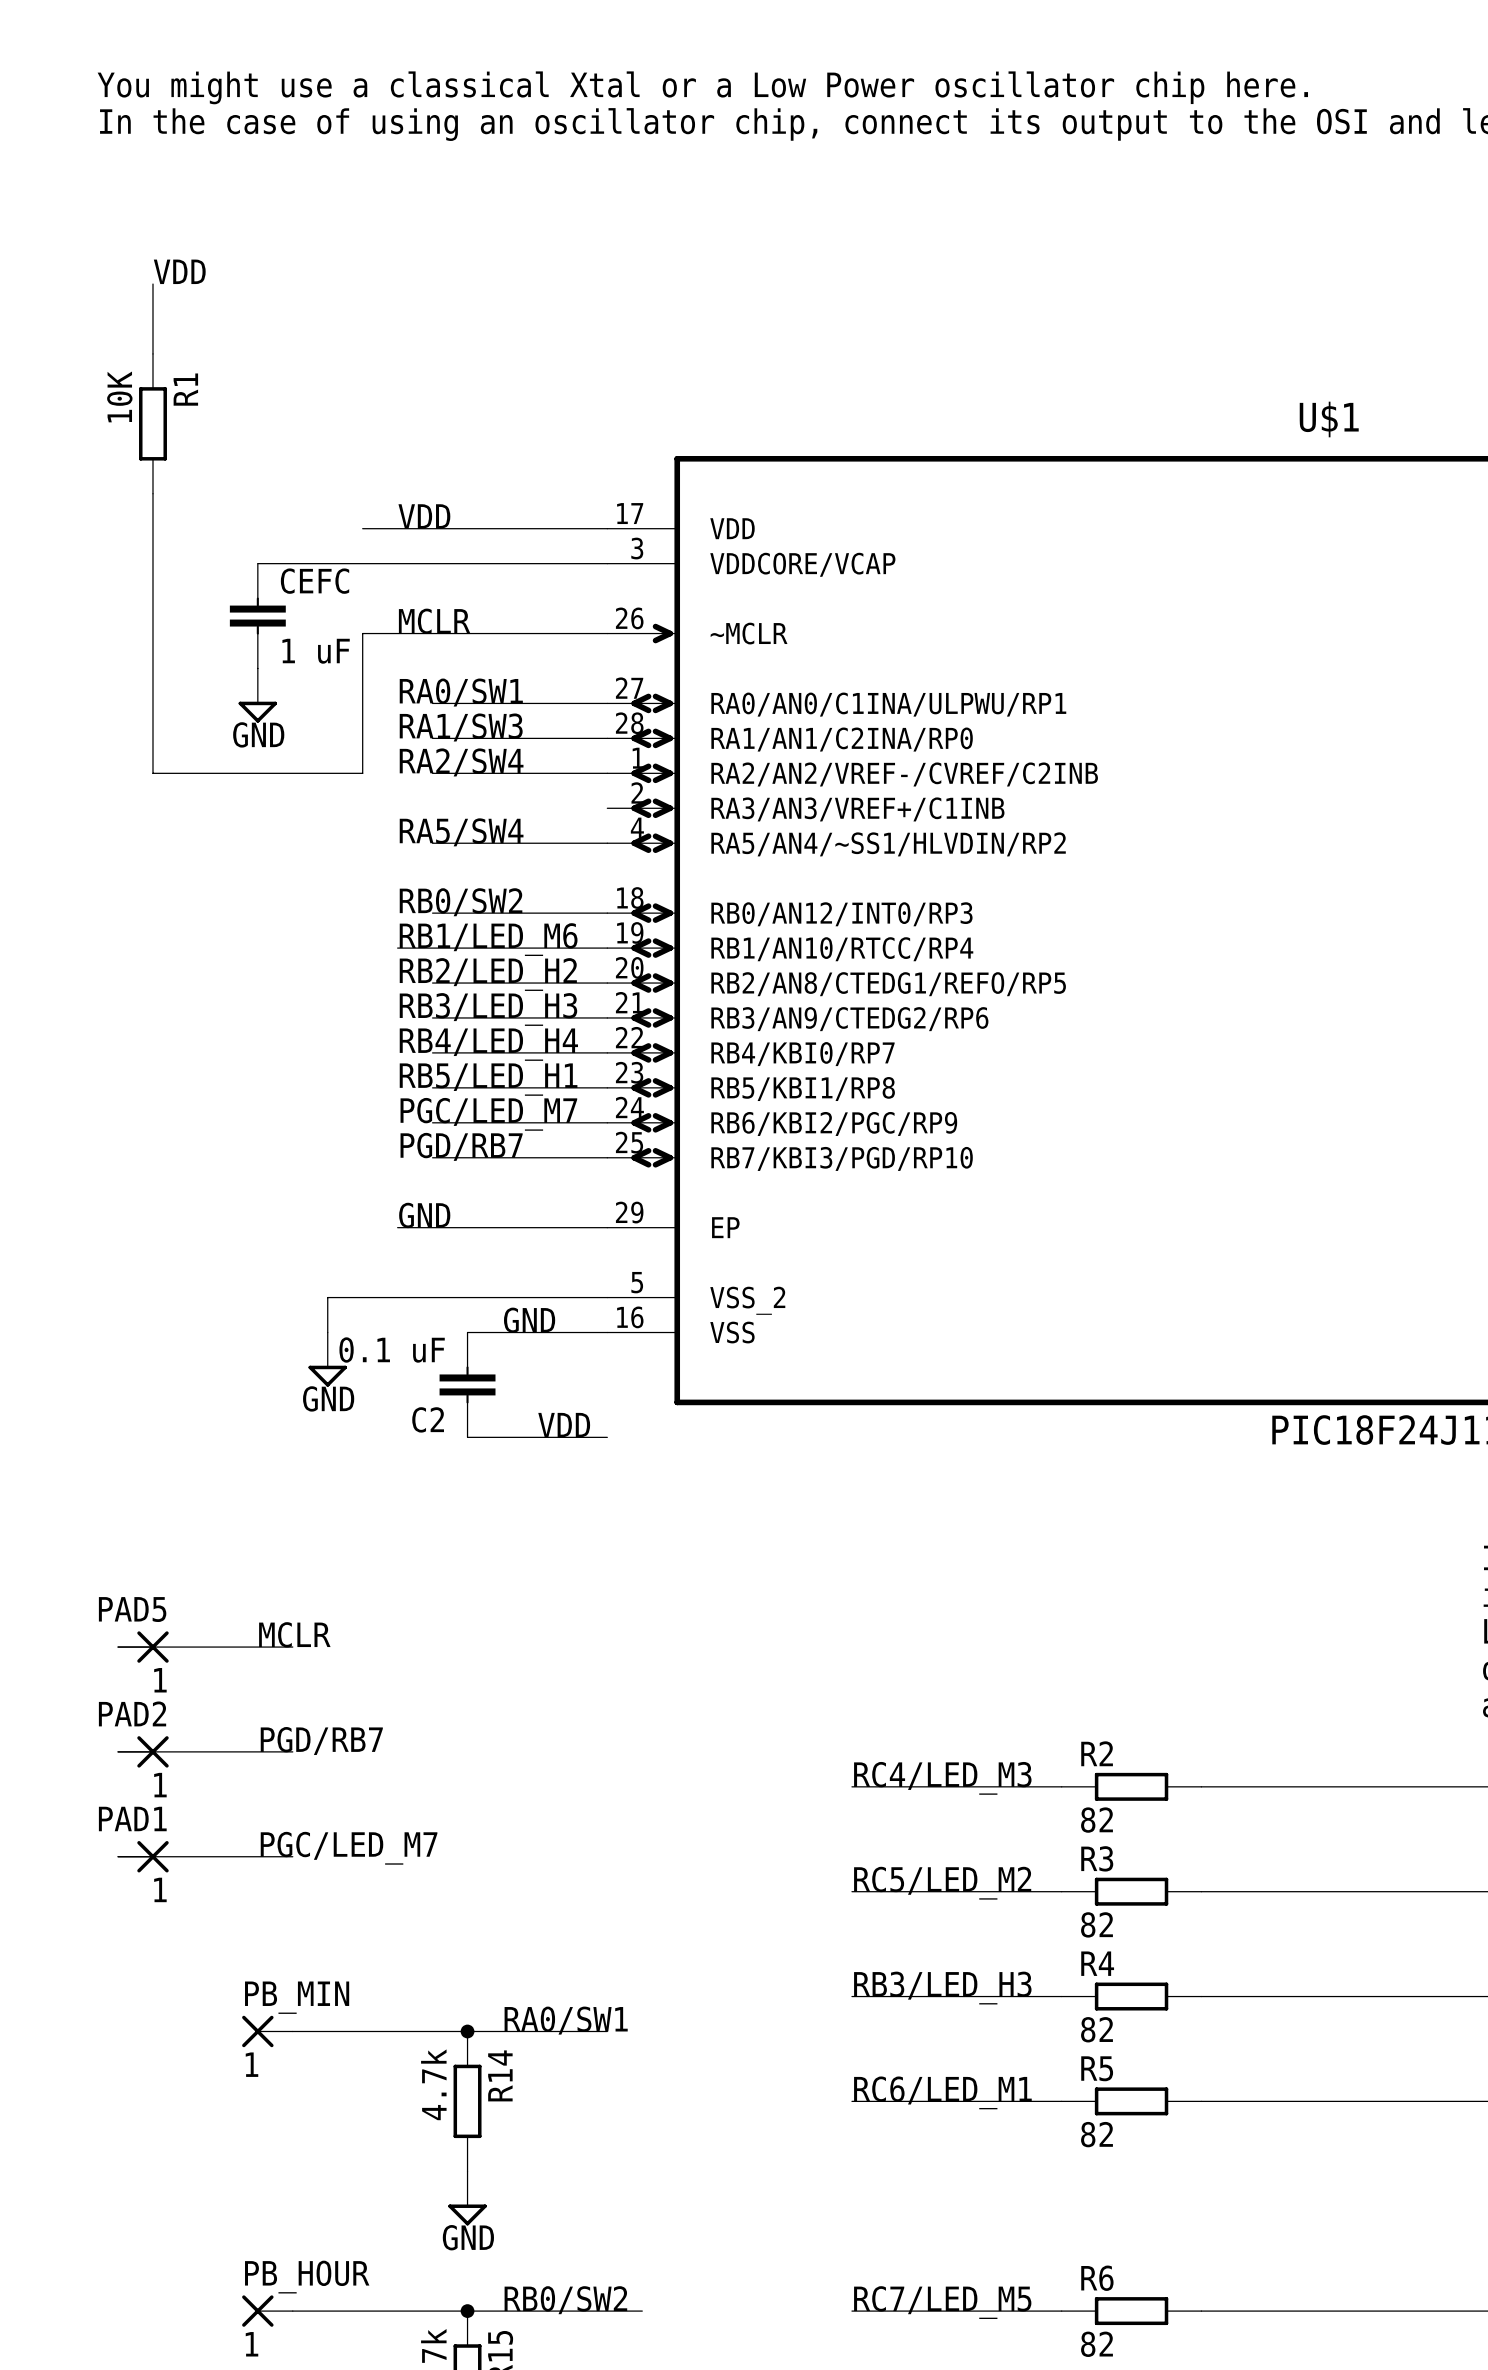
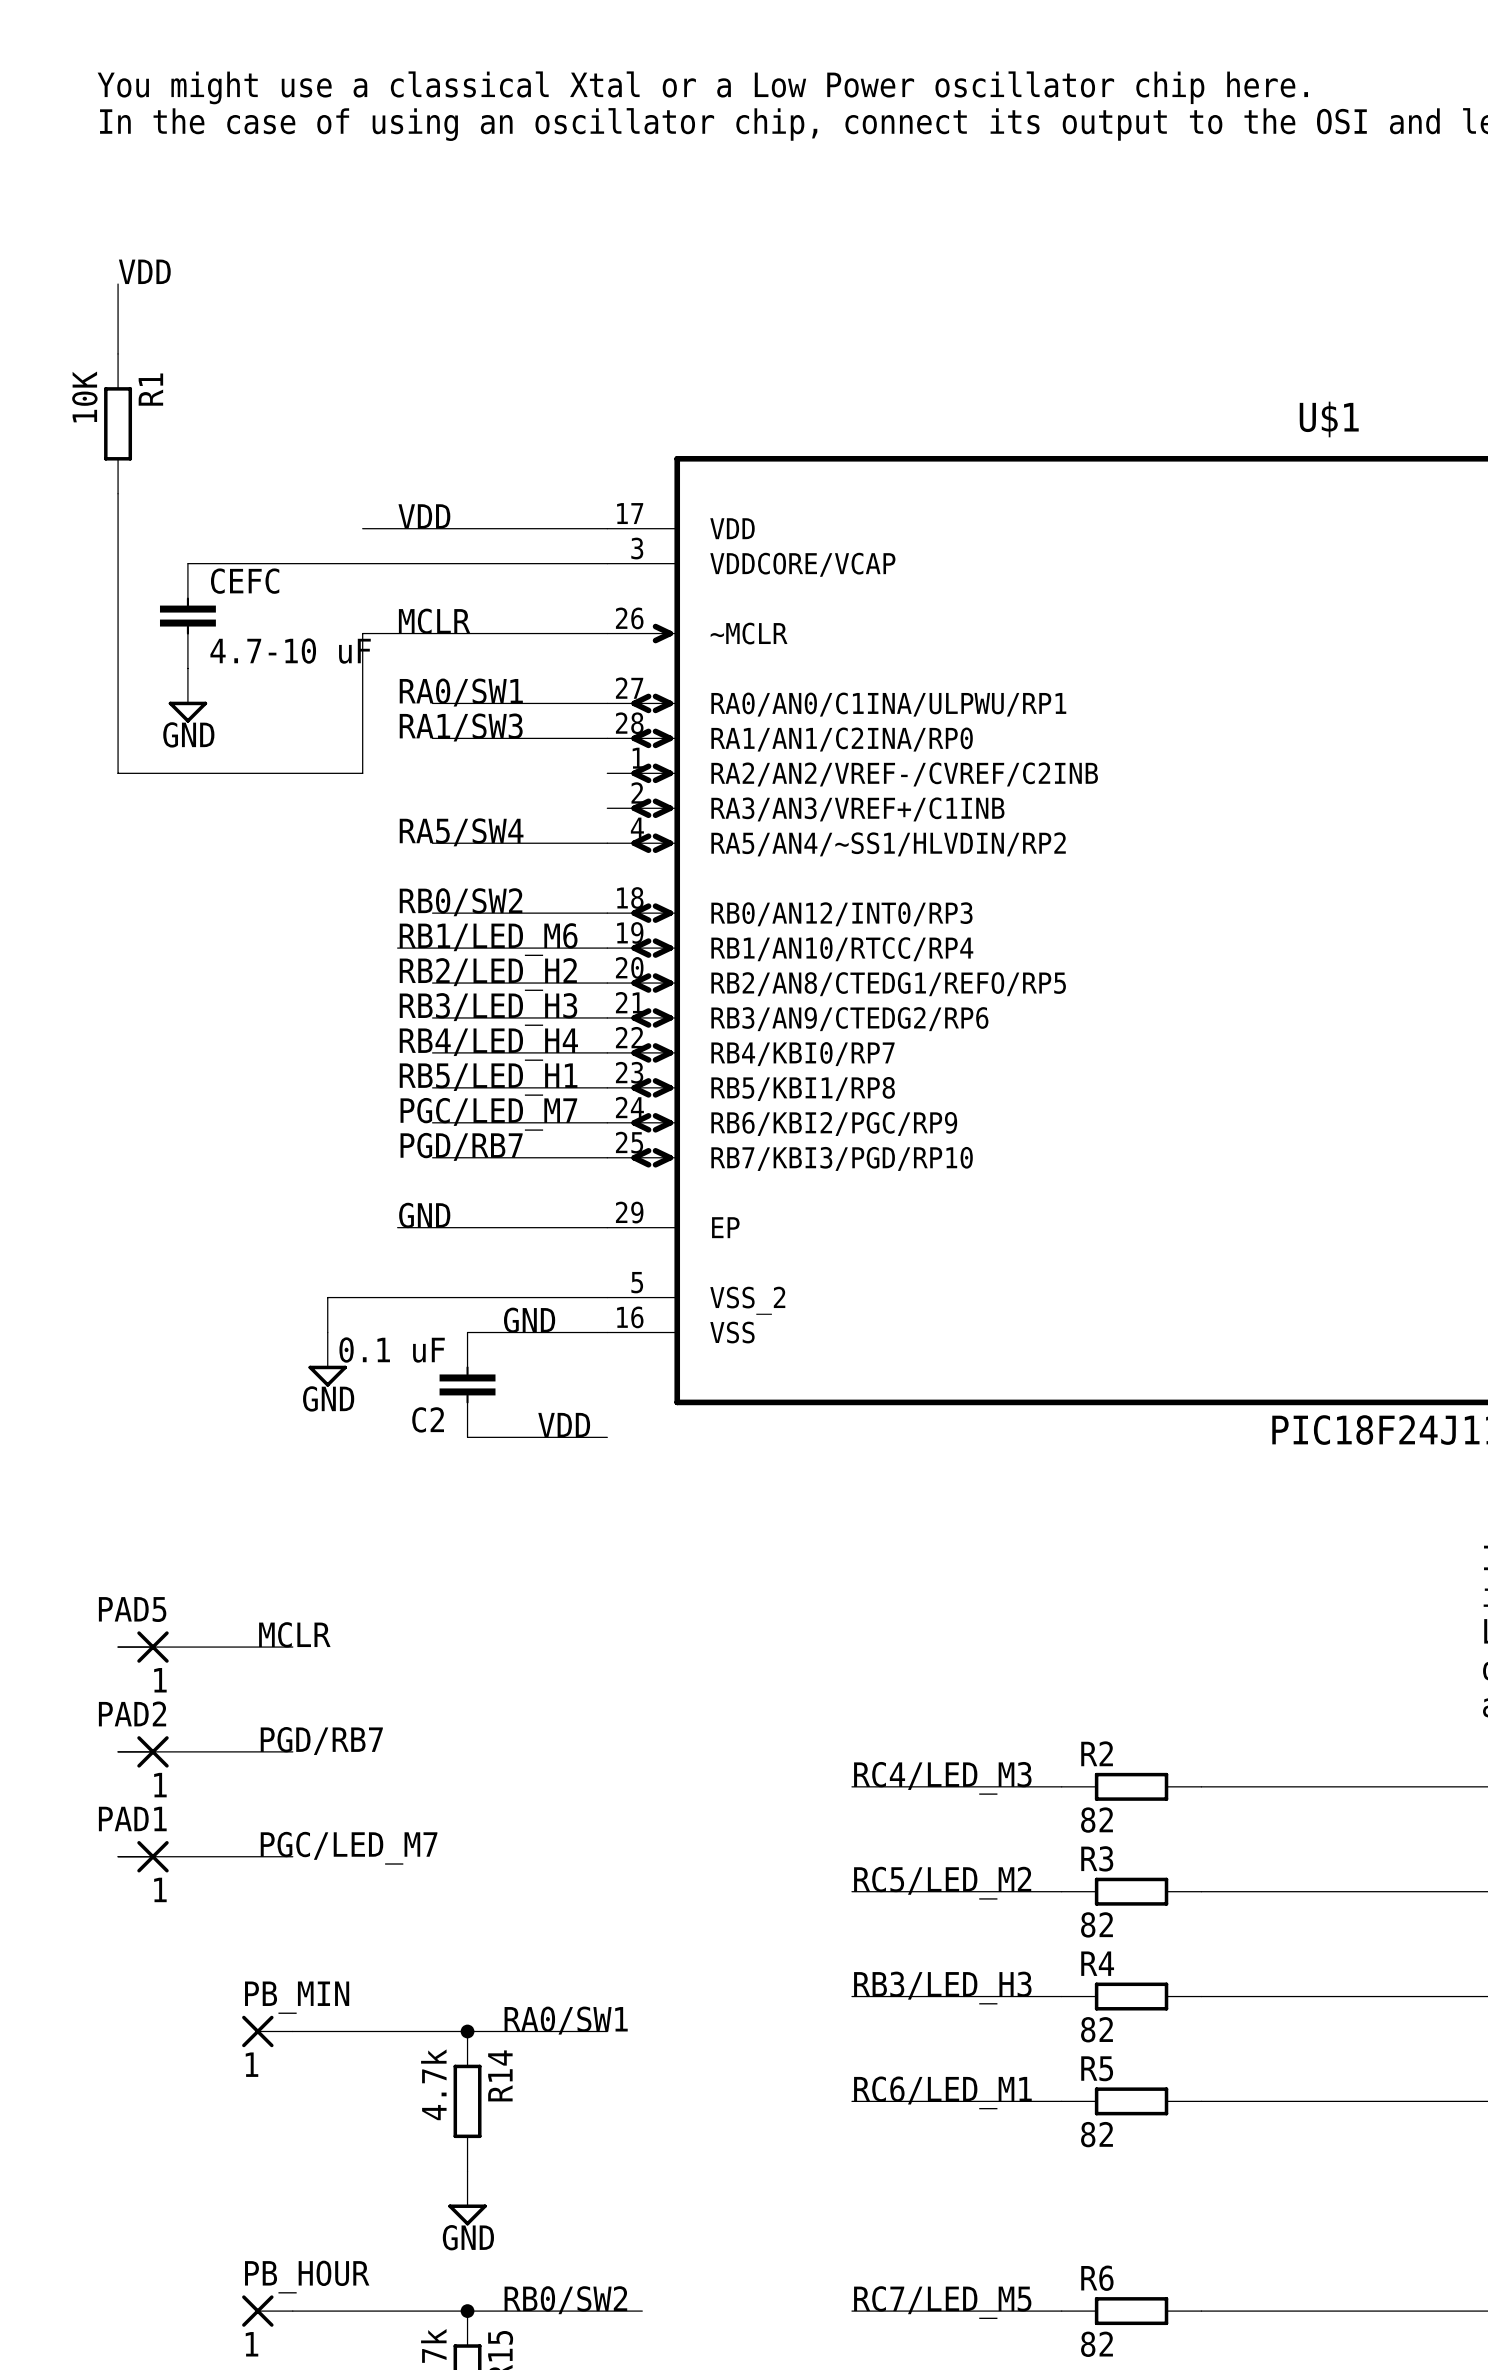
label position: VDD (179, 271) -> VDD (144, 271)
wire: (152, 284) (152, 353) -> (118, 284) (118, 353)
R1 position: (152, 423) -> (118, 423)
wire: (152, 493) (152, 773) -> (118, 493) (118, 773) (152, 773)
wire: none -> (187, 563) (257, 563)
CEFC: none -> 4.7-10 uF (187, 616)
CEFC: 1 uF (257, 616) -> none
power symbol position: GND (257, 695) -> GND (187, 695)
label: RA2/SW4 (461, 762) -> none
wire: (432, 773) (607, 773) -> none

